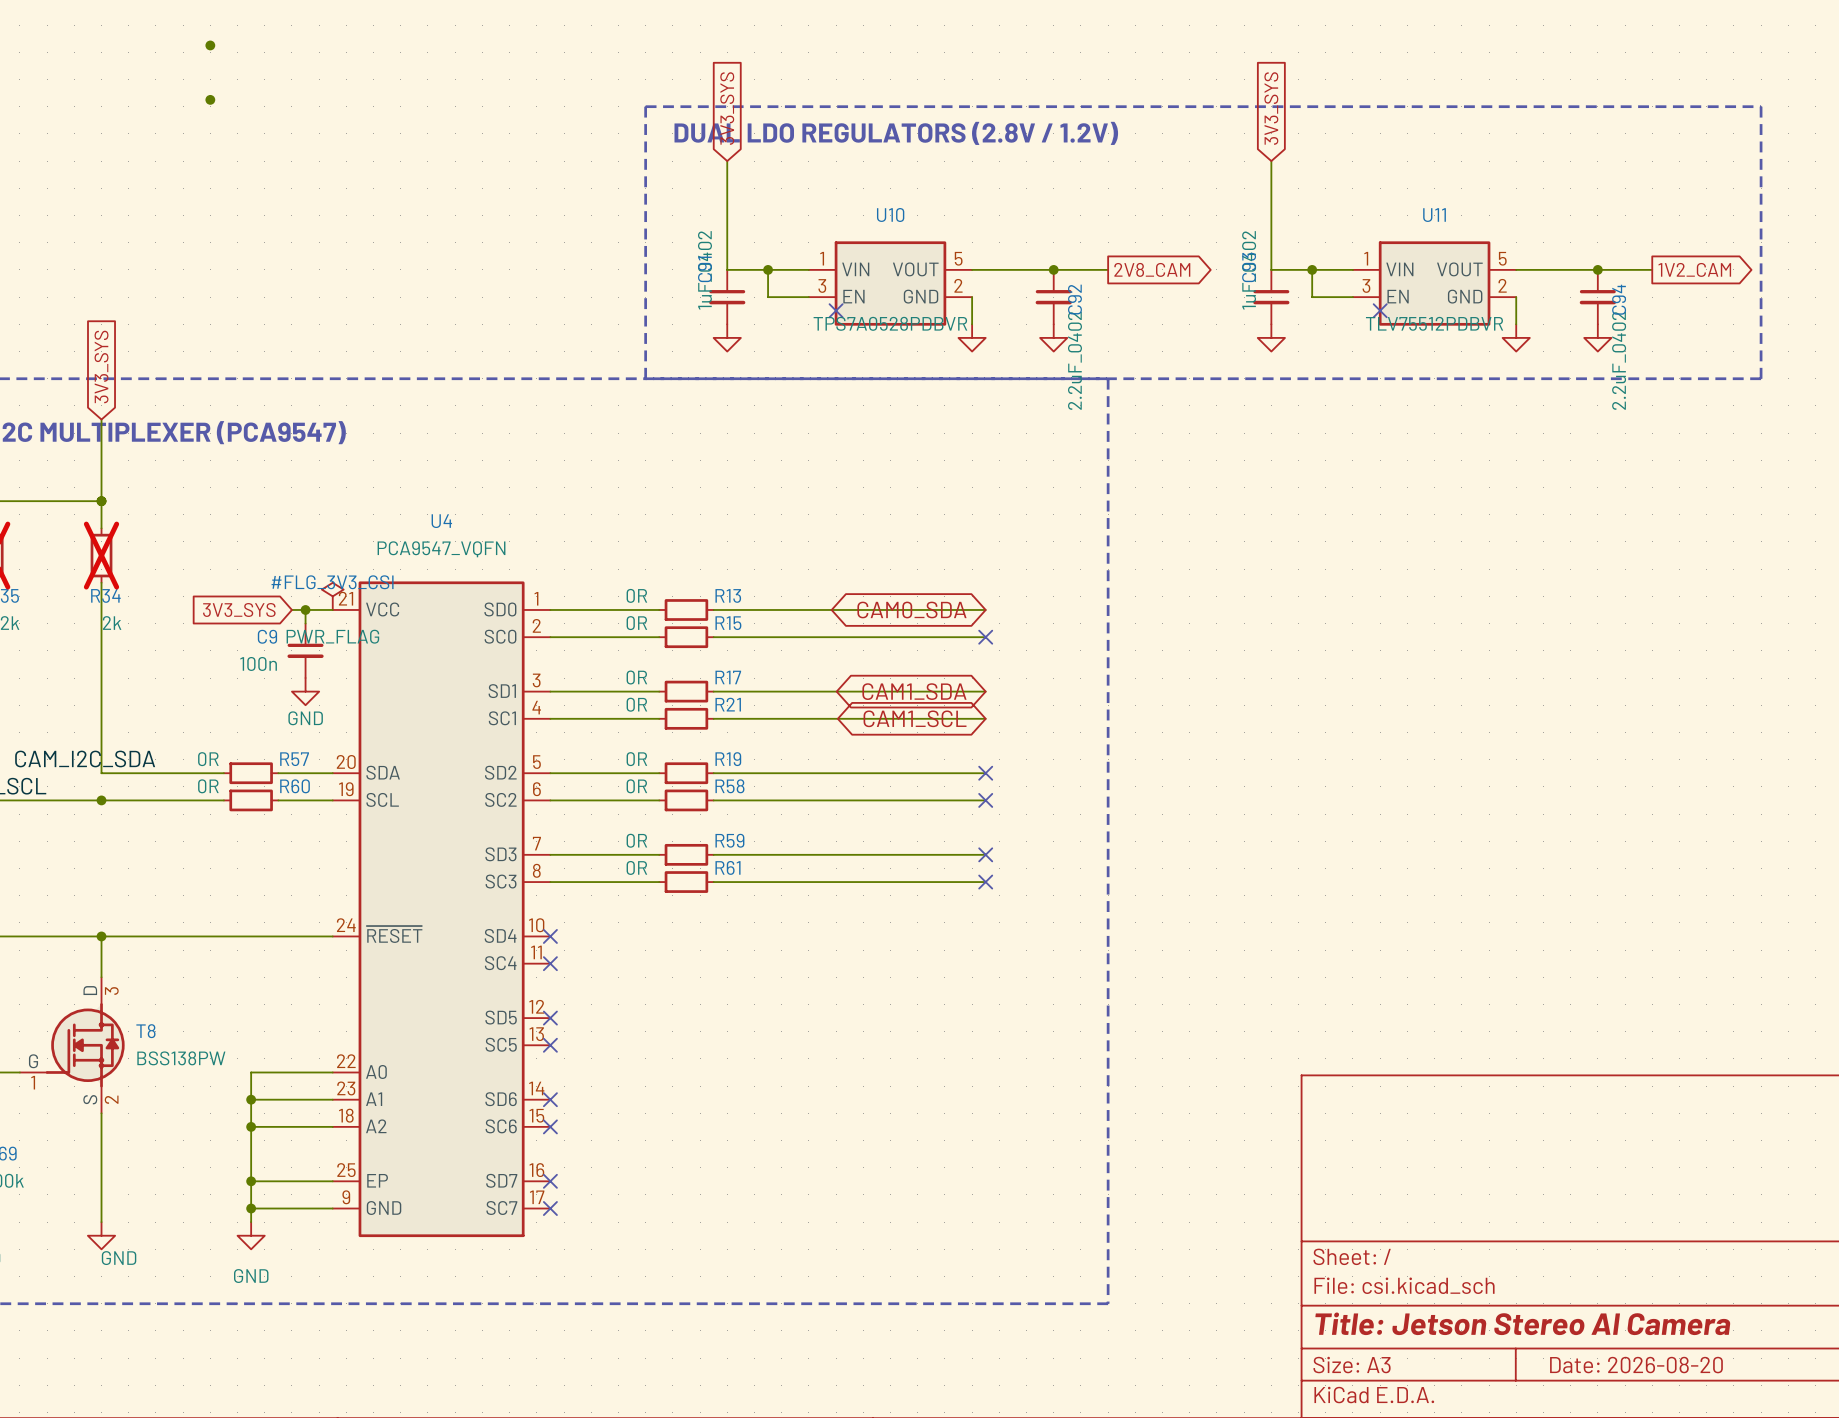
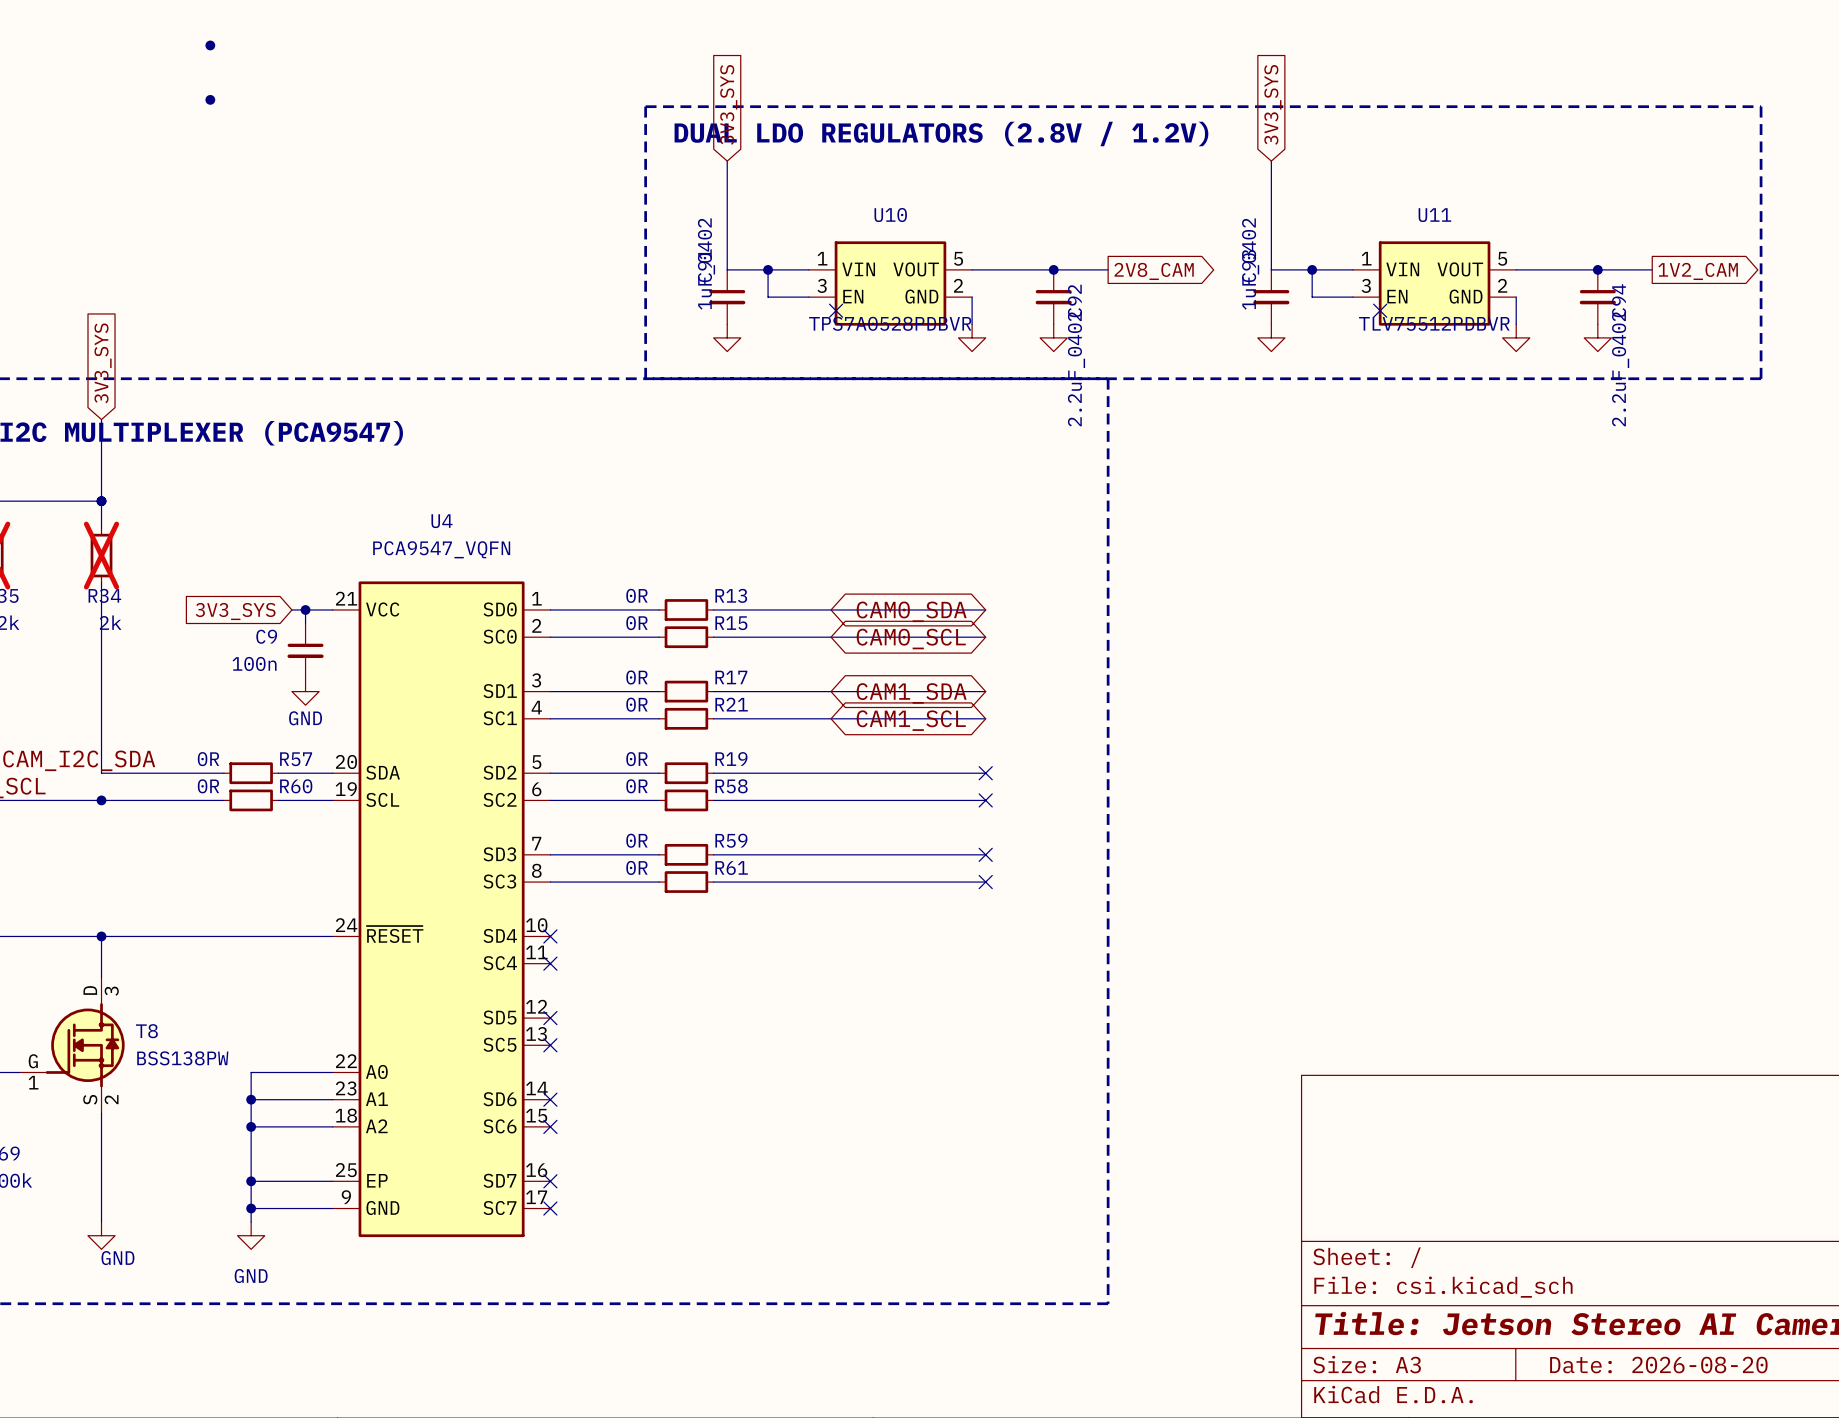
#FLG_3V3_CSI: PWR_FLAG (332, 596) -> none
global label: none -> CAM0_SCL (911, 639)
no-connect mark: (985, 637) -> none

